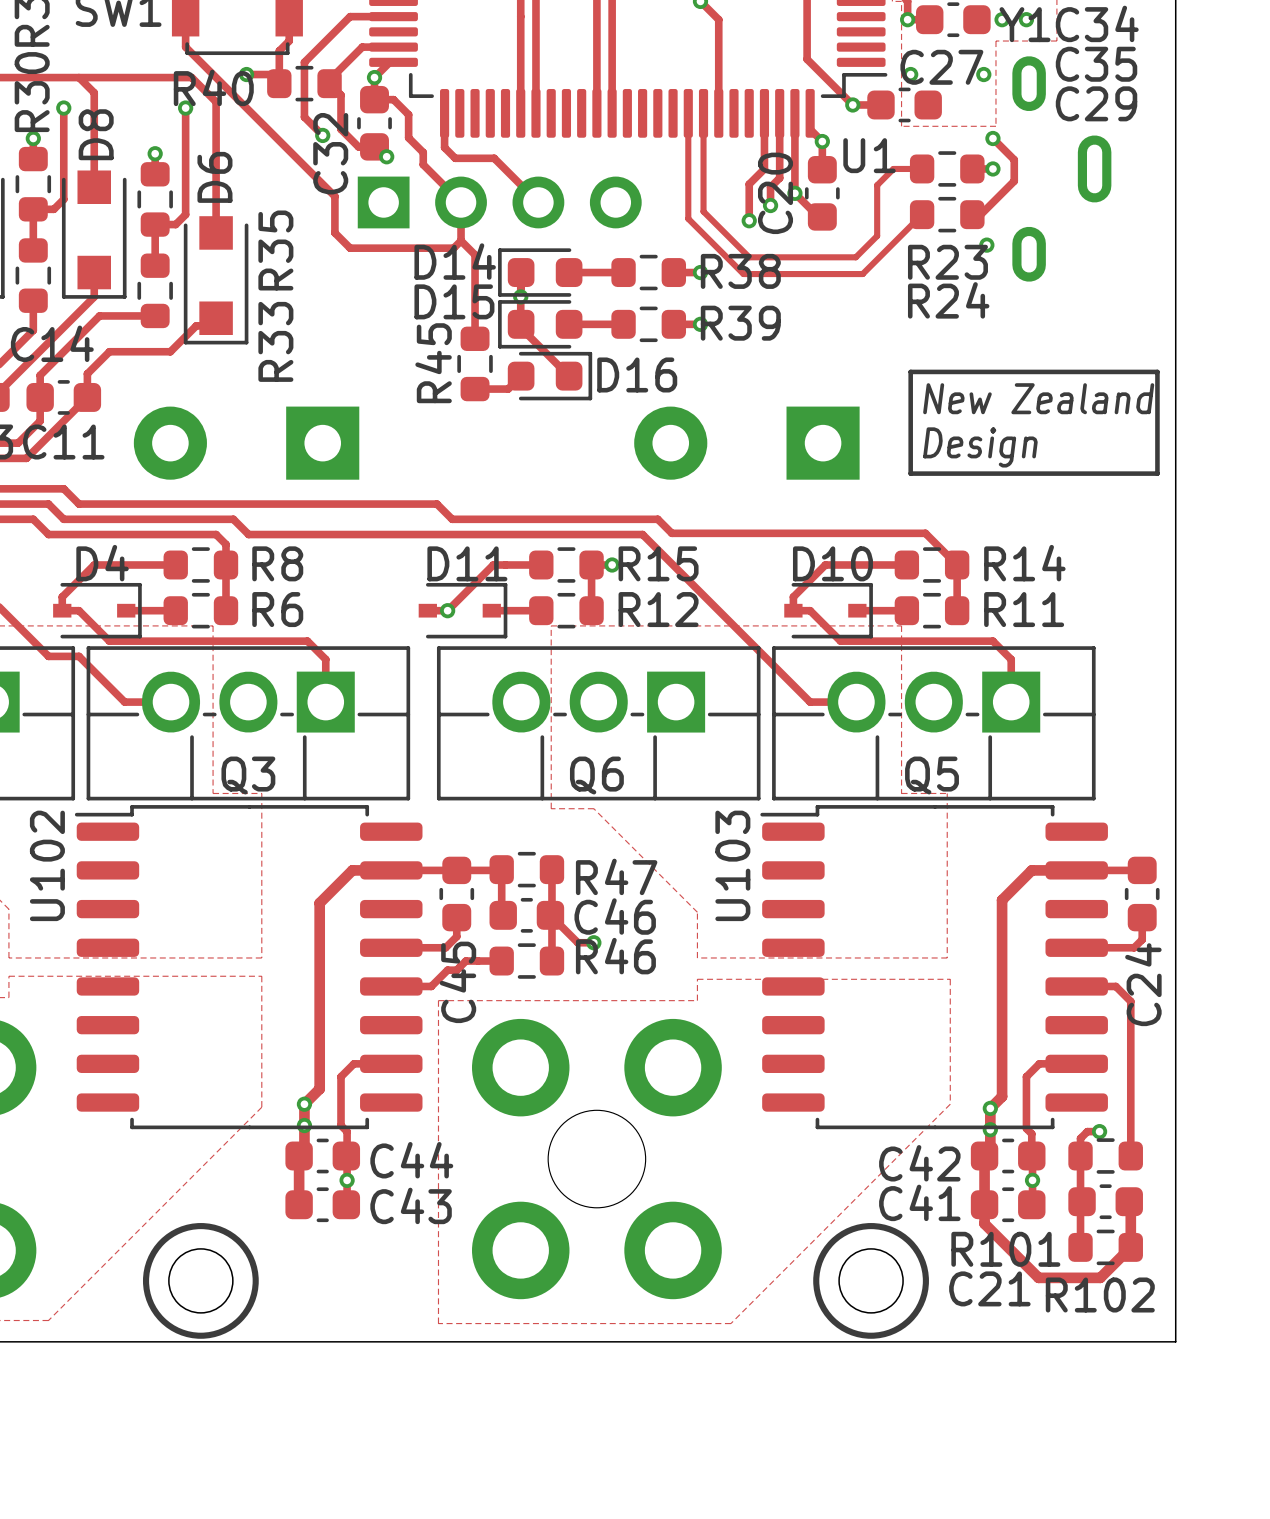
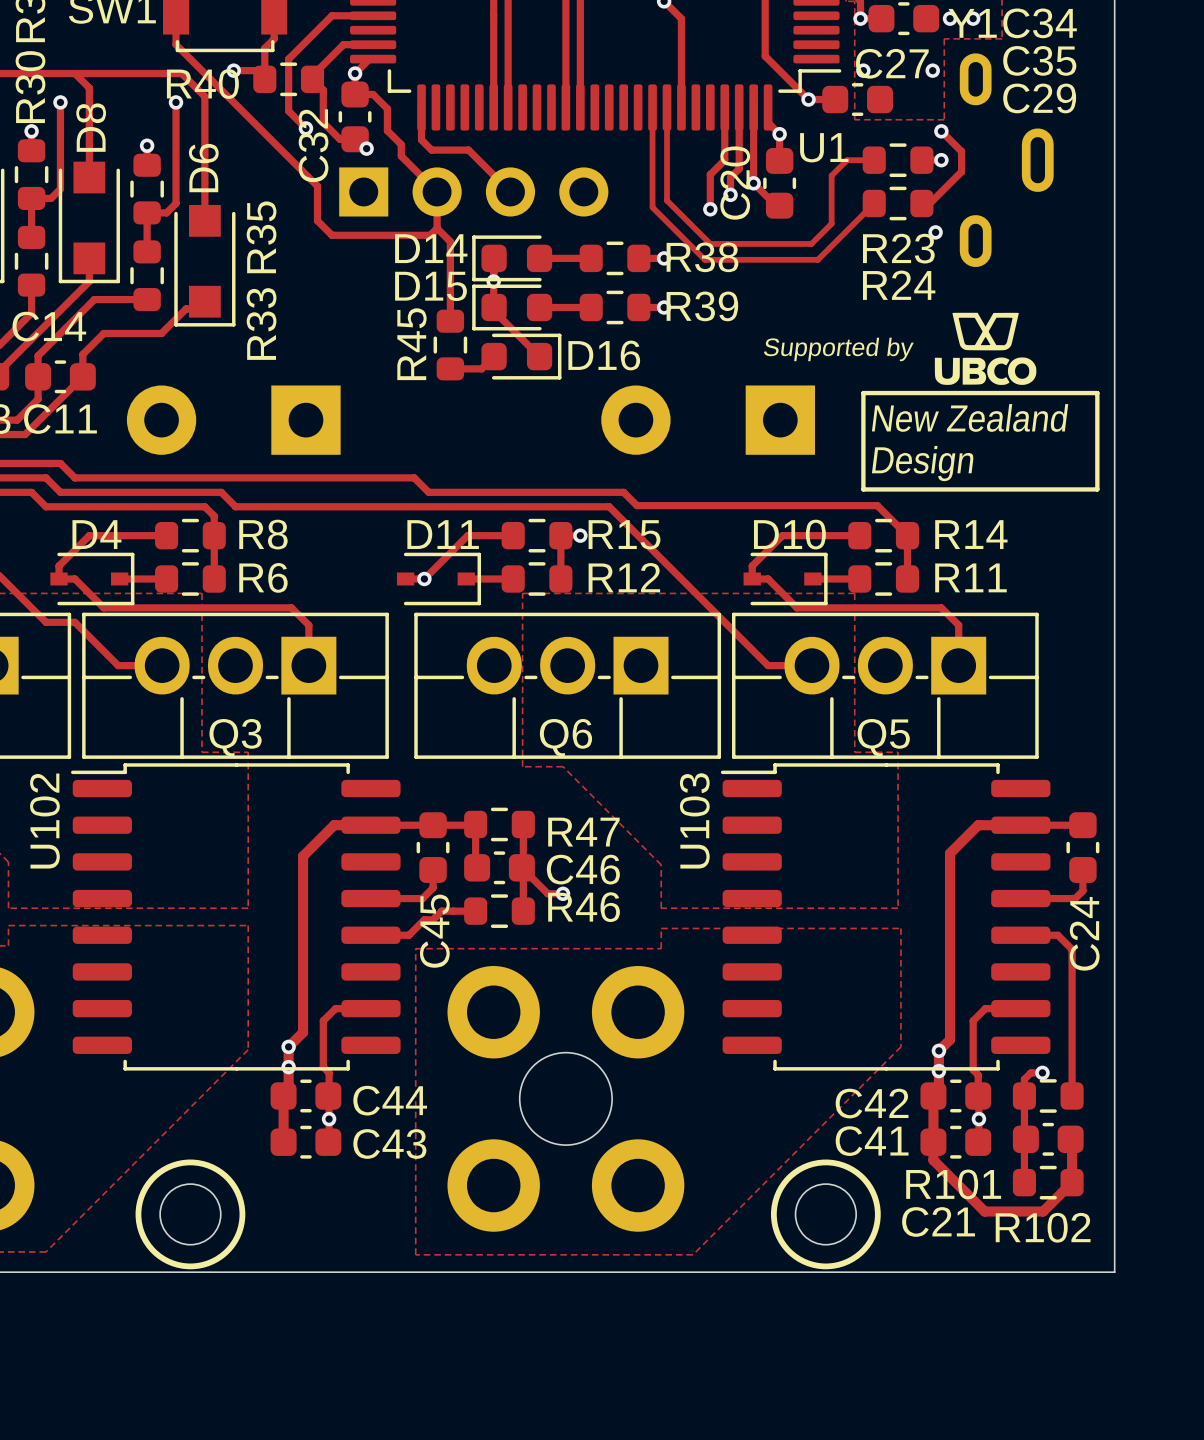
drawing: none -> [934, 312, 1037, 385]
text: none -> Supported by (838, 349)
text: New Zealand (1038, 398) -> none
line: (910, 414) (910, 371) (1157, 371) (1157, 414) -> (863, 393) (1097, 393)
text: Design (980, 447) -> New Zealand (970, 417)
line: (910, 473) (1157, 473) -> (863, 449) (863, 489) (1097, 489) (1097, 449)
text: none -> Design (922, 463)

